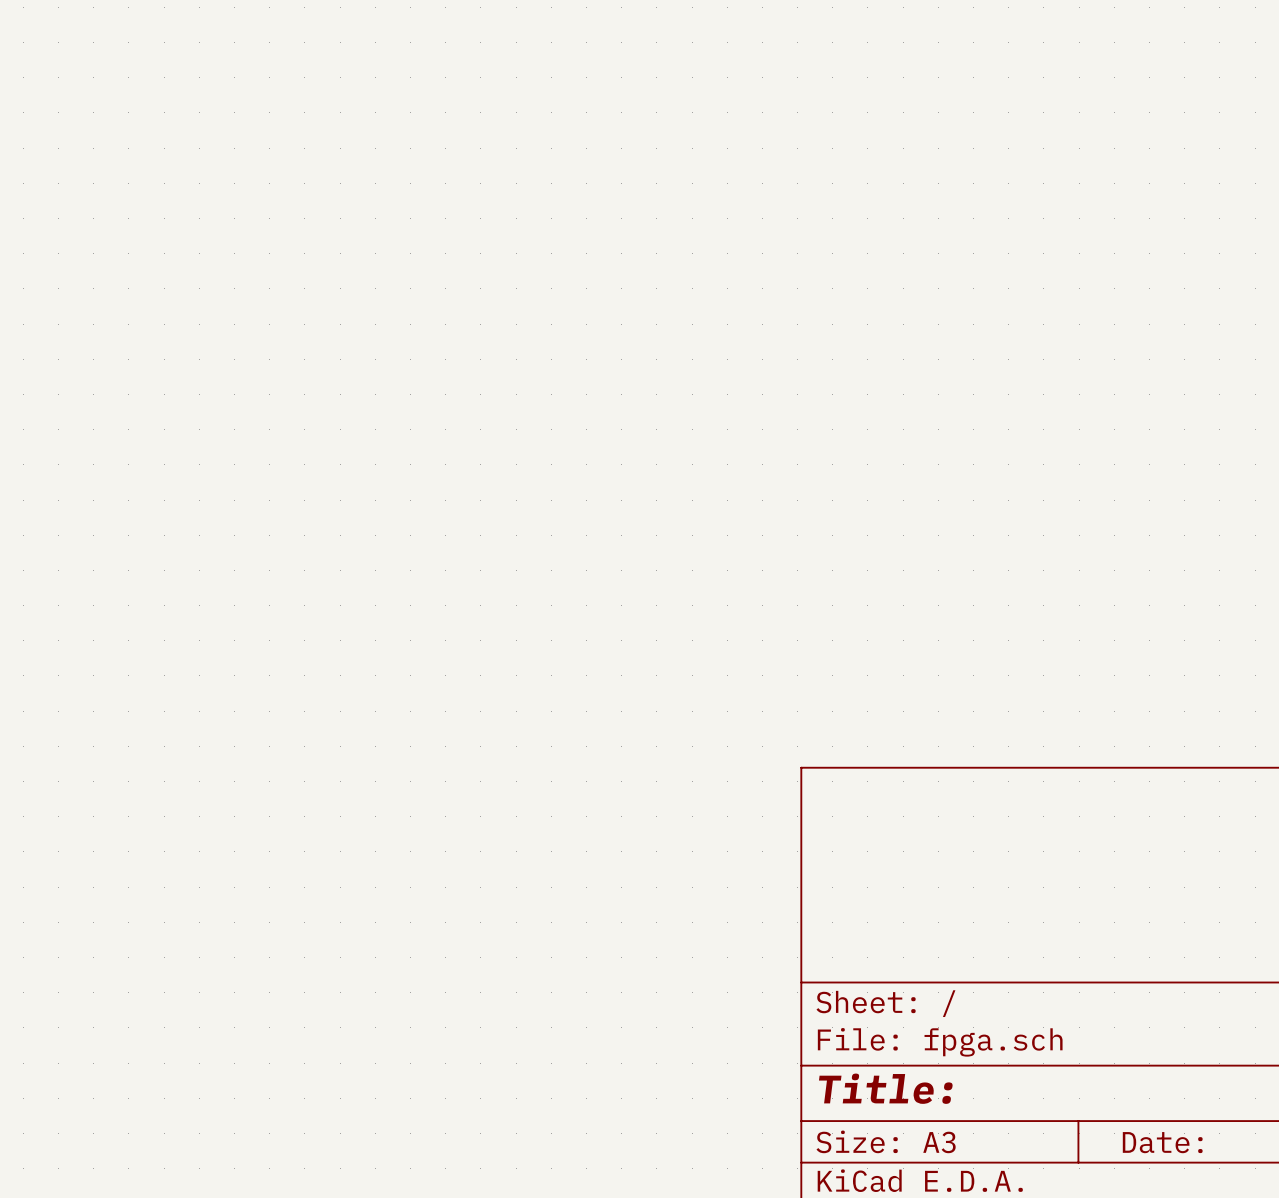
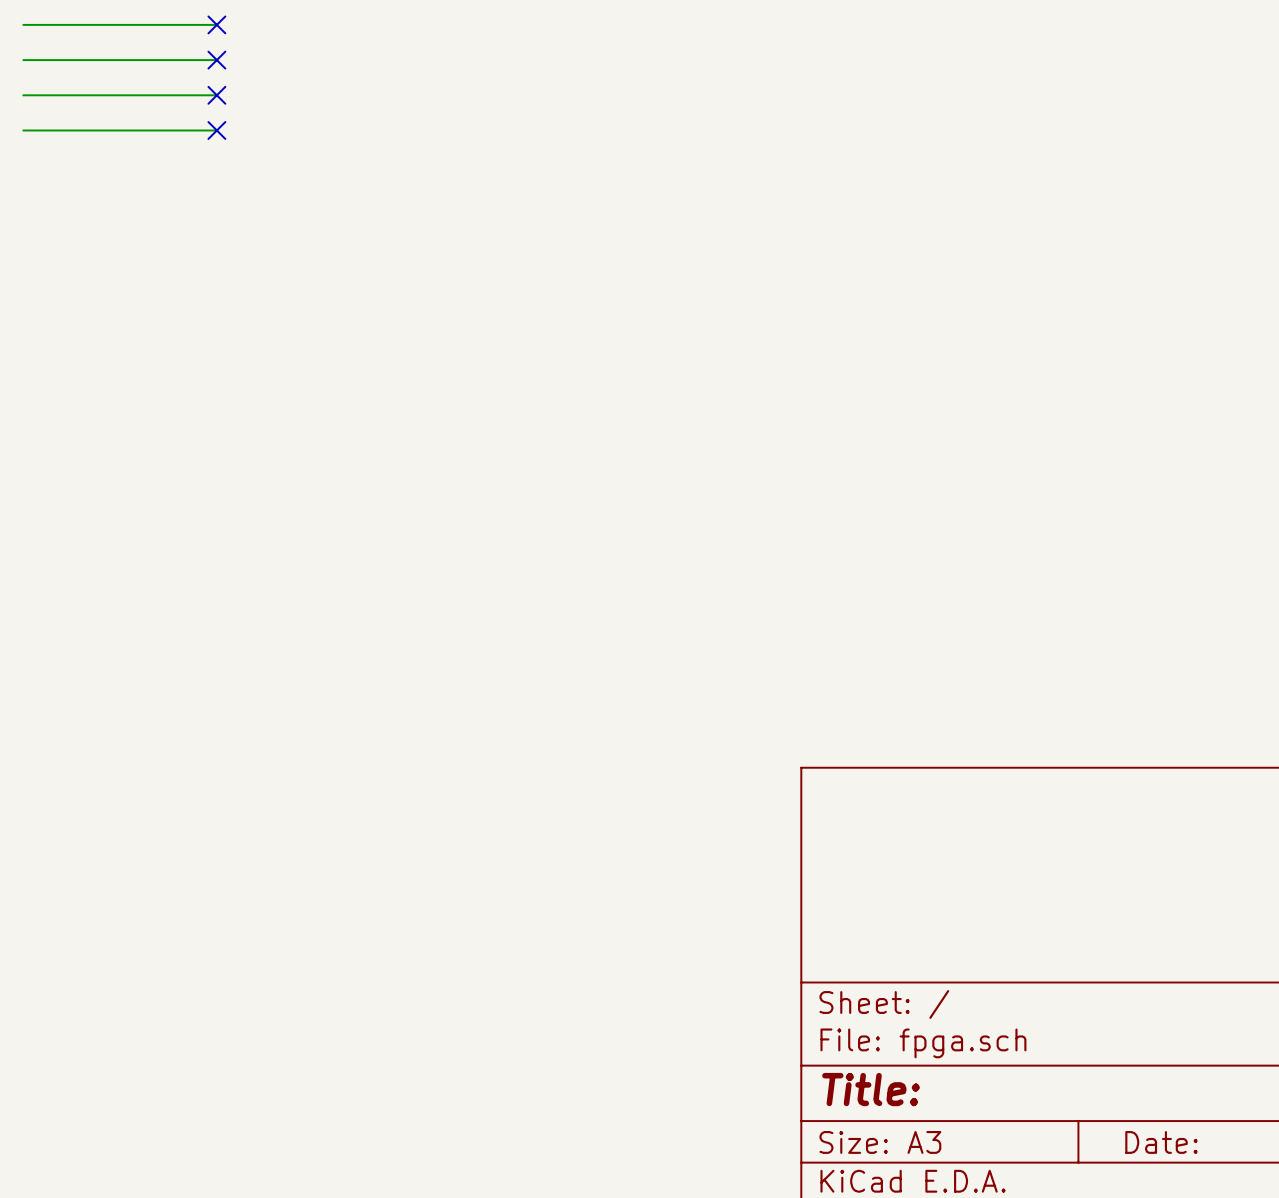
wire: none -> (23, 24) (216, 24)
no-connect mark: none -> (216, 24)
wire: none -> (23, 60) (216, 60)
no-connect mark: none -> (216, 60)
wire: none -> (23, 95) (216, 95)
no-connect mark: none -> (216, 95)
wire: none -> (23, 130) (216, 130)
no-connect mark: none -> (216, 130)

